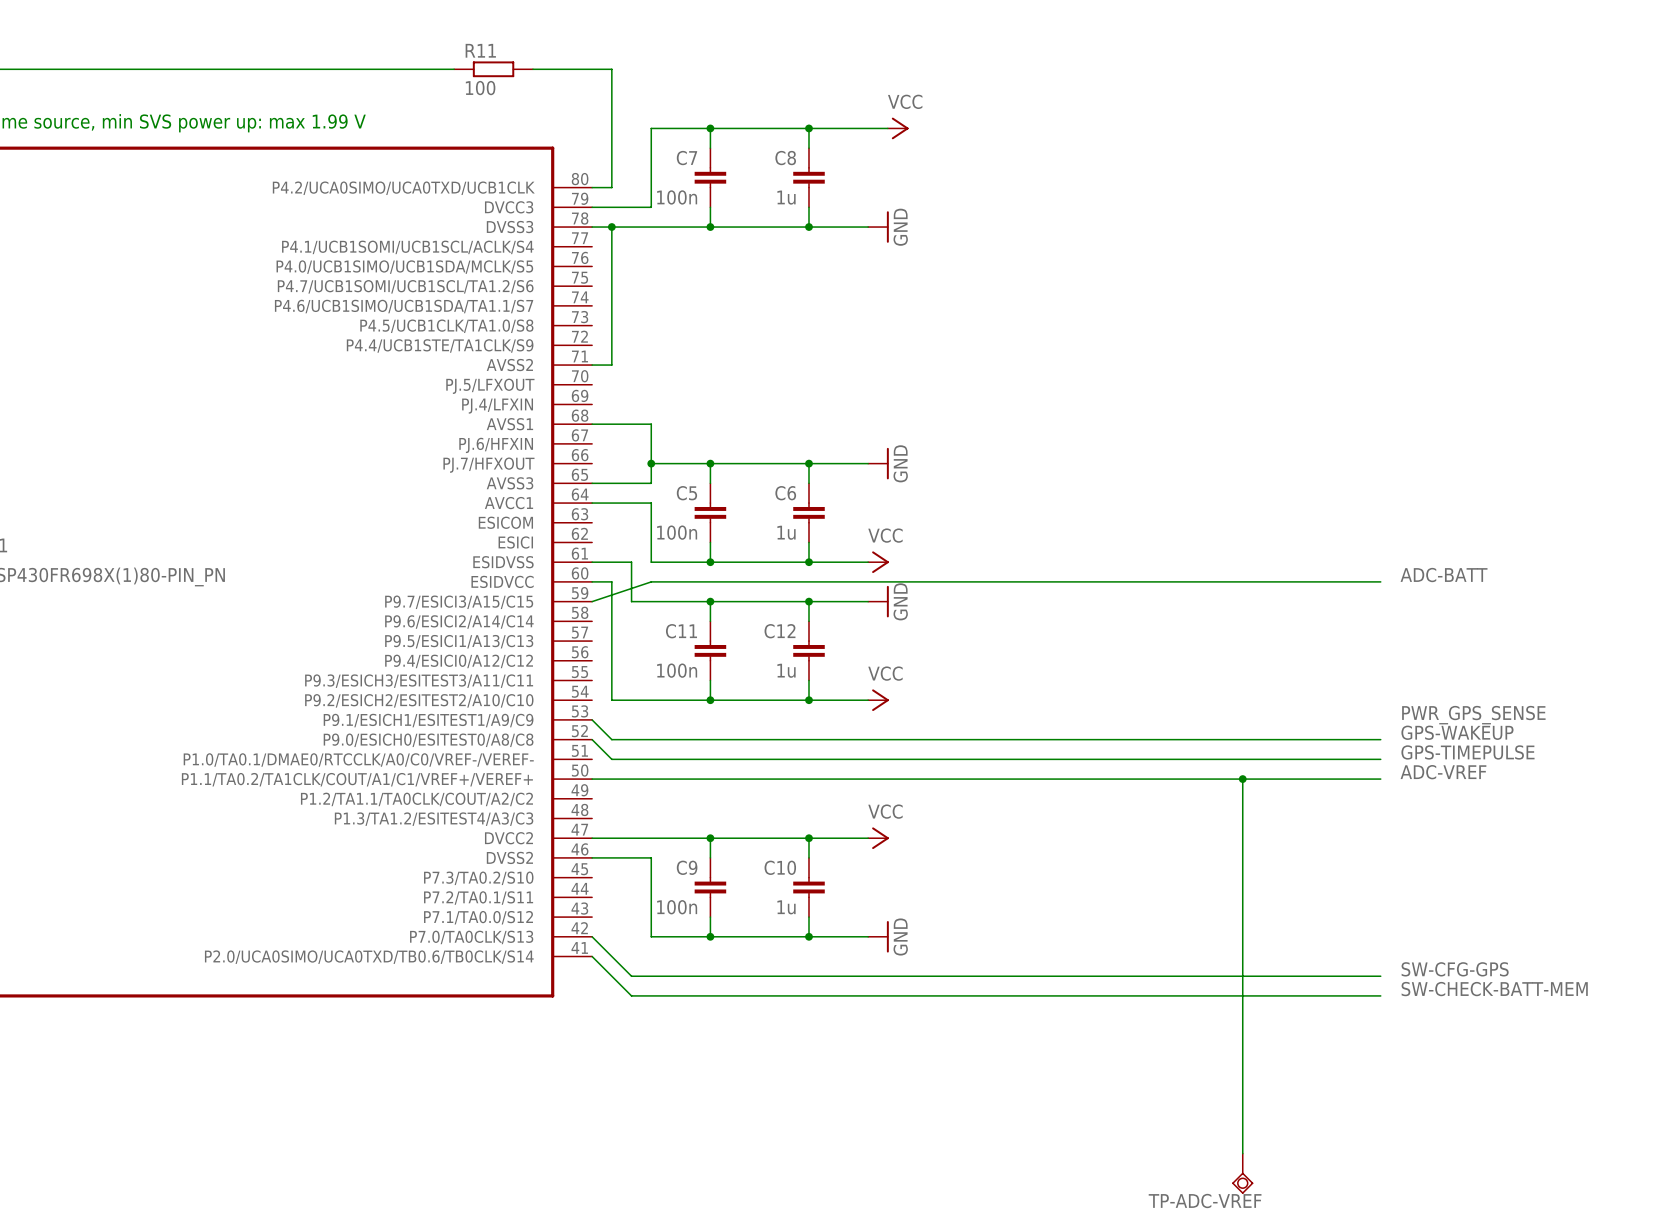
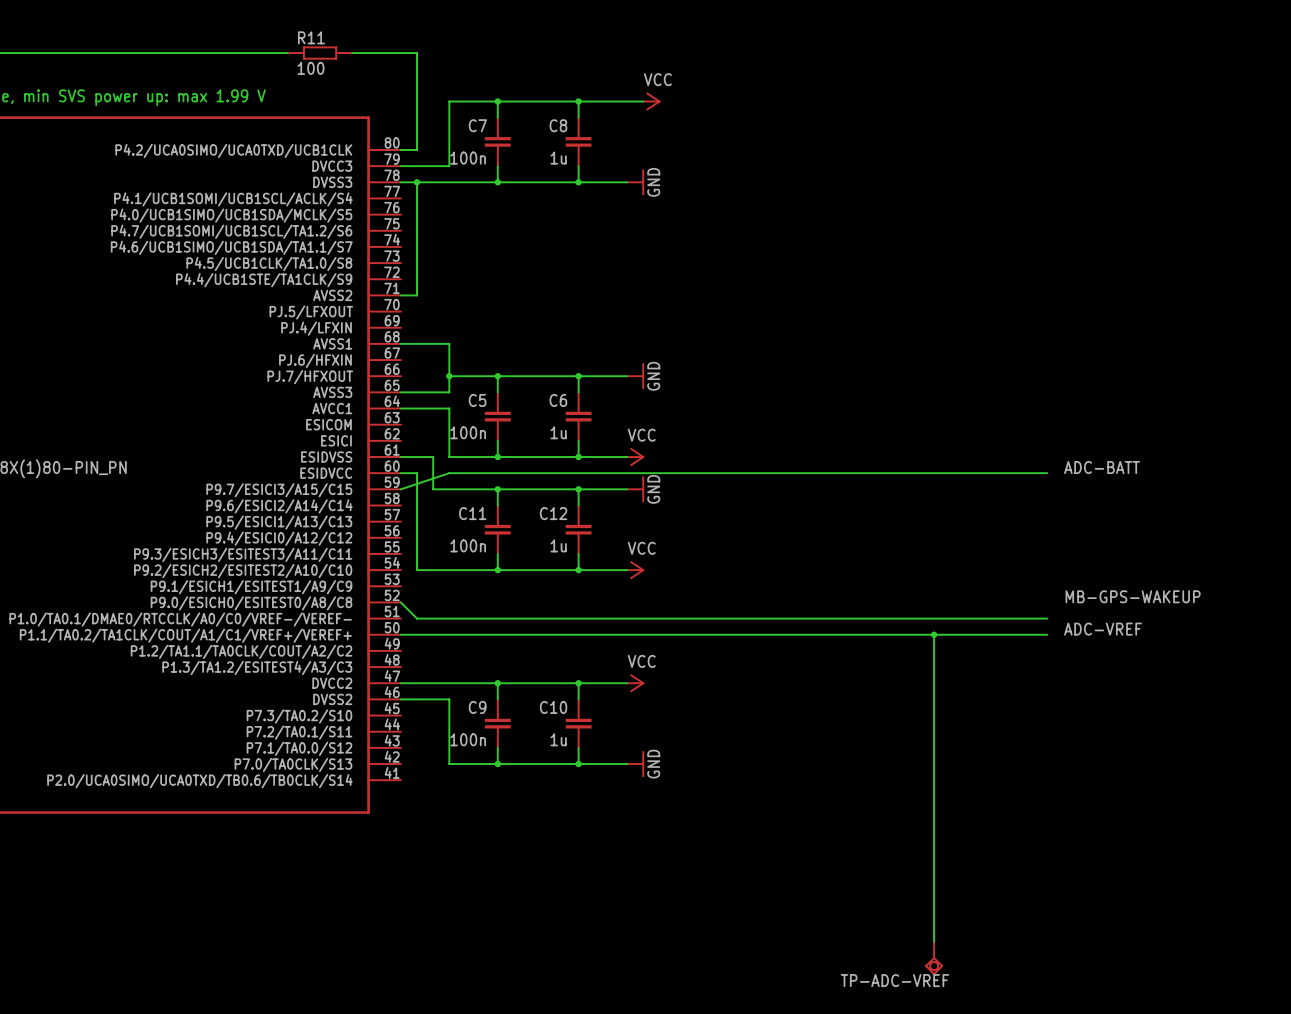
label: PWR_GPS_SENSE (1473, 715) -> none
wire: (592, 719) (611, 739) (1380, 739) -> none
label: GPS-WAKEUP (1457, 732) -> MB-GPS-WAKEUP (1133, 596)
label: GPS-TIMEPULSE (1467, 752) -> none
wire: (592, 936) (631, 976) (1380, 976) -> none
wire: (592, 956) (631, 995) (1380, 995) -> none
label: SW-CFG-GPS (1455, 969) -> none
label: SW-CHECK-BATT-MEM (1494, 989) -> none

